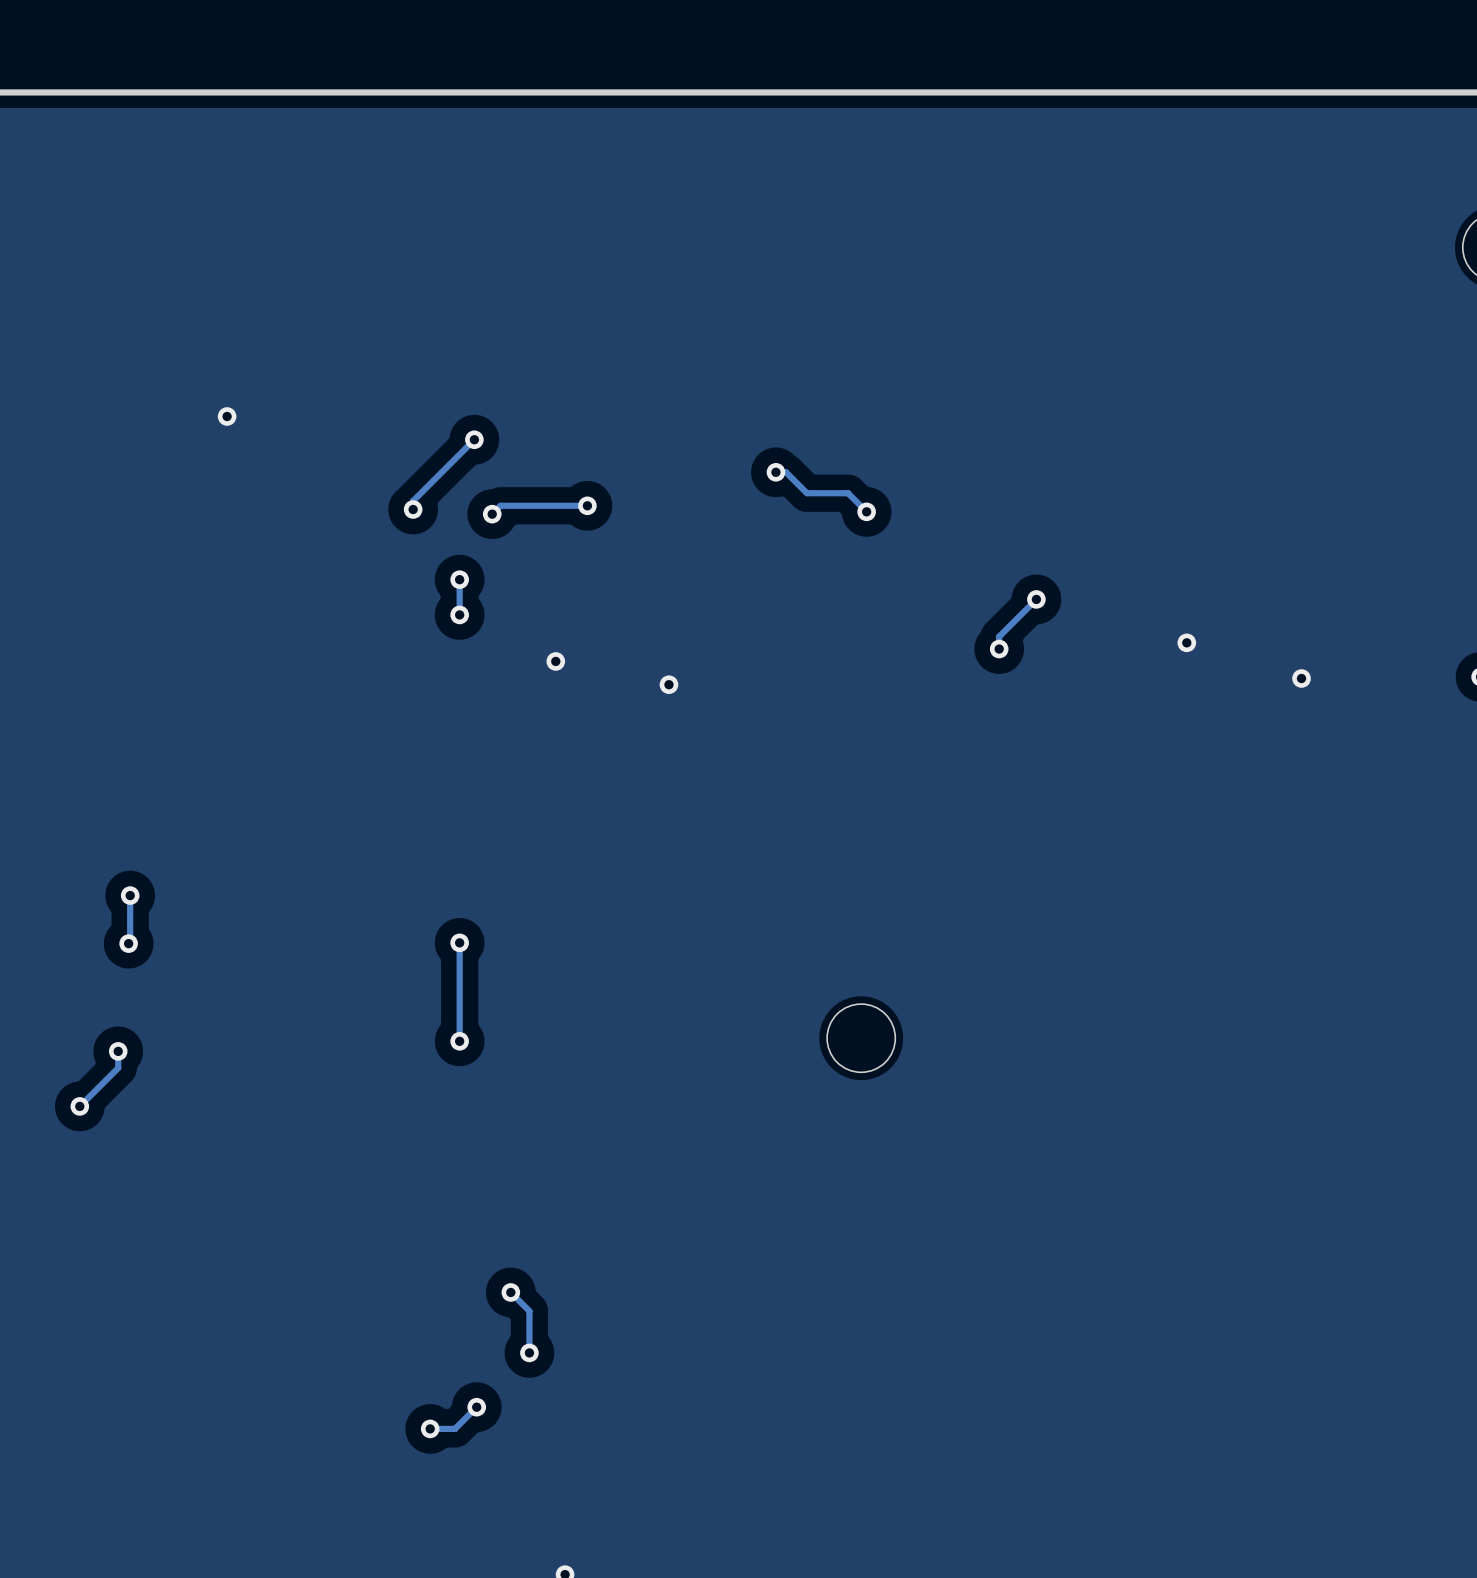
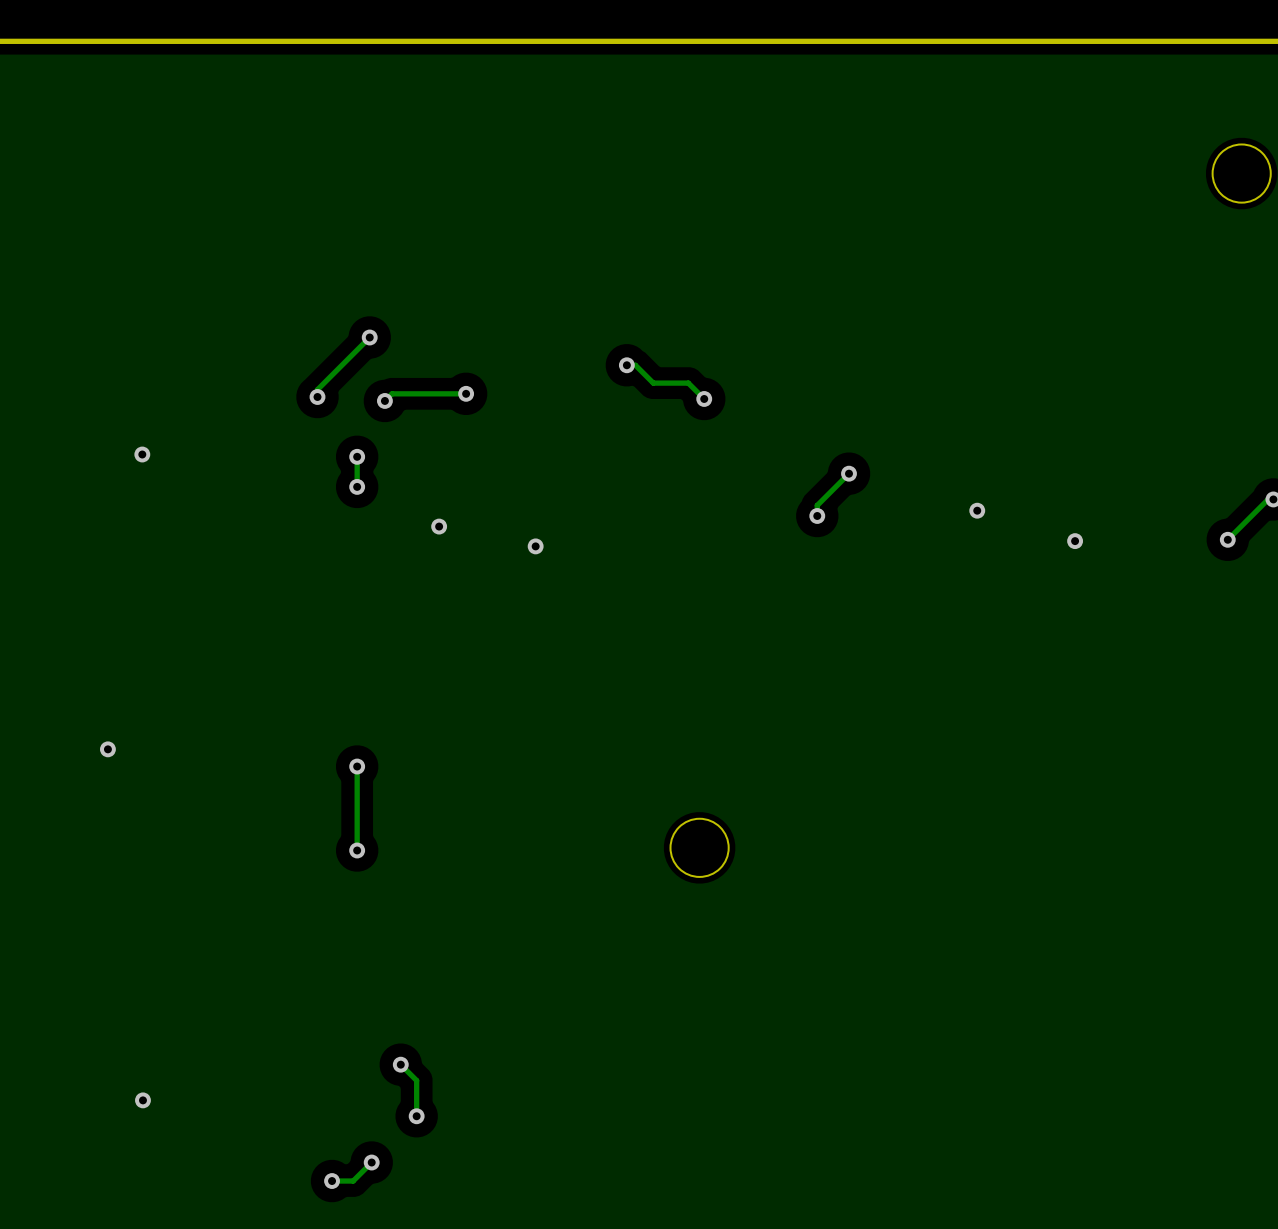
via position: (227, 416) -> (142, 454)
track: (130, 895) (128, 943) -> none
via: (130, 895) -> none
via: none -> (107, 749)
via: (128, 943) -> none
track: (118, 1051) (118, 1068) (79, 1106) -> none
via: (118, 1051) -> none
via: (79, 1106) -> none
via: none -> (142, 1100)

